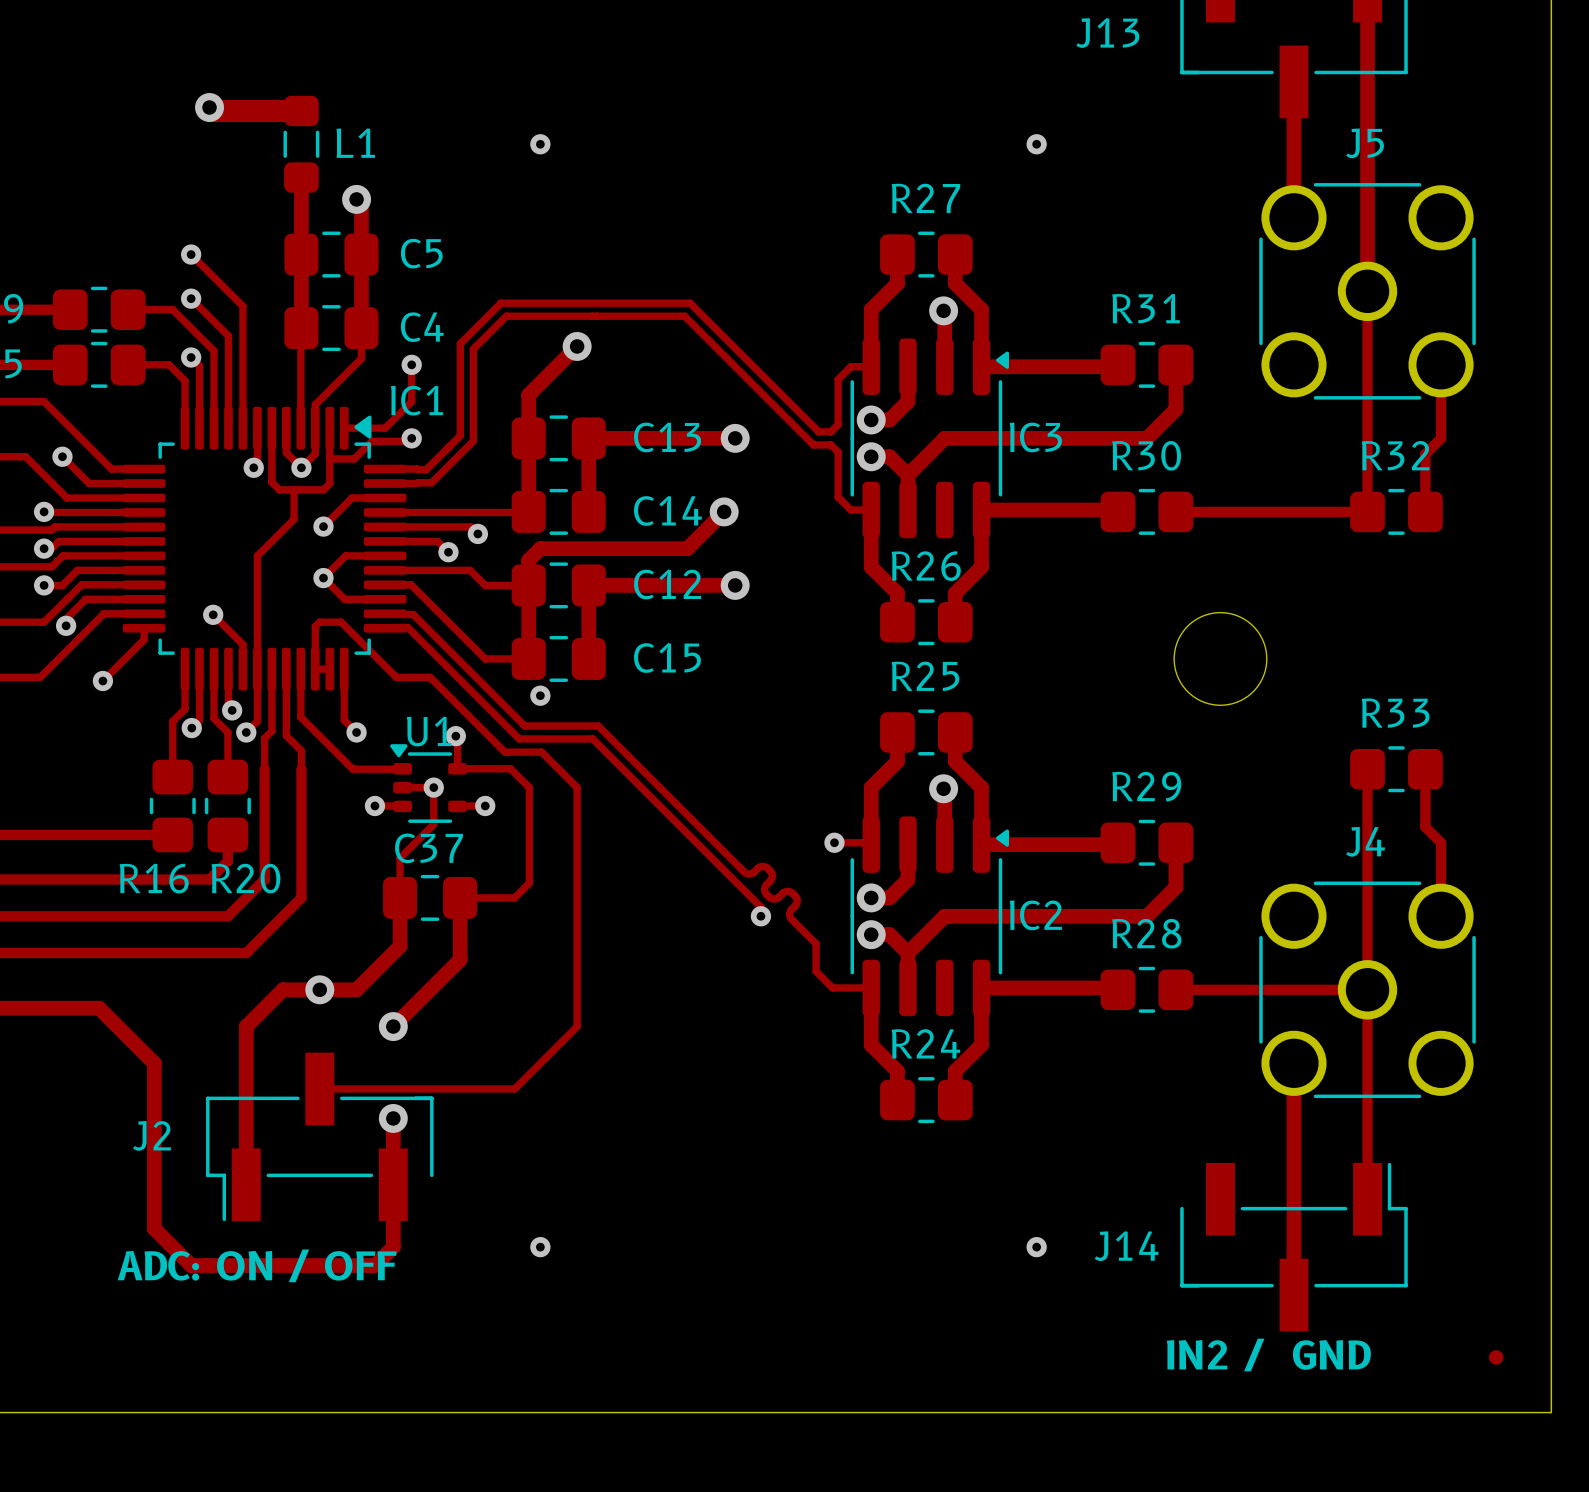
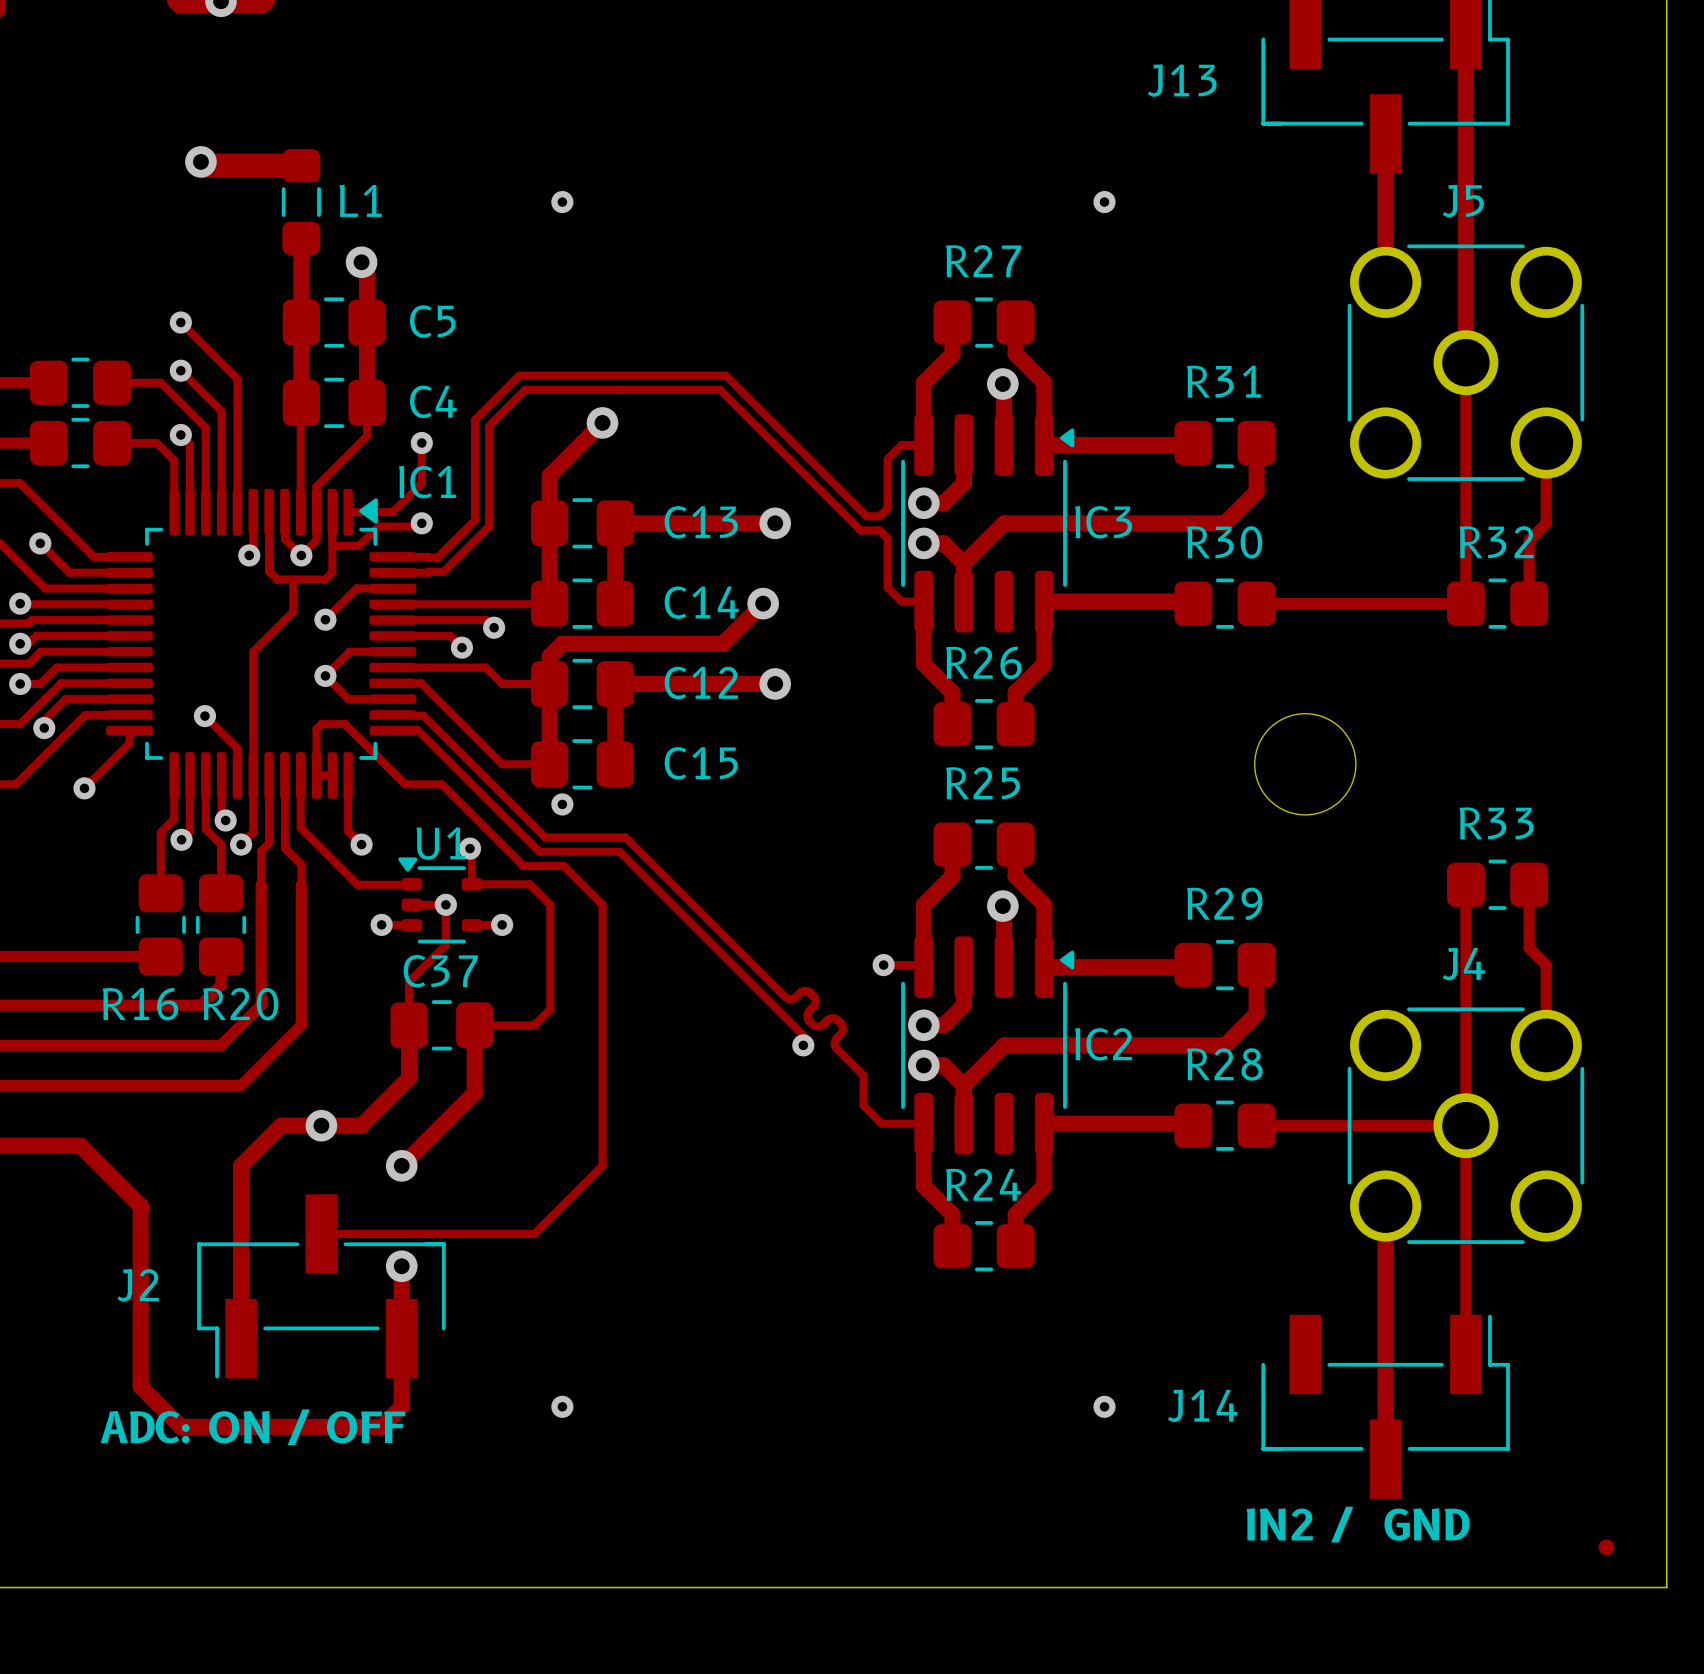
part position: (1496, 1357) -> (1606, 1547)

